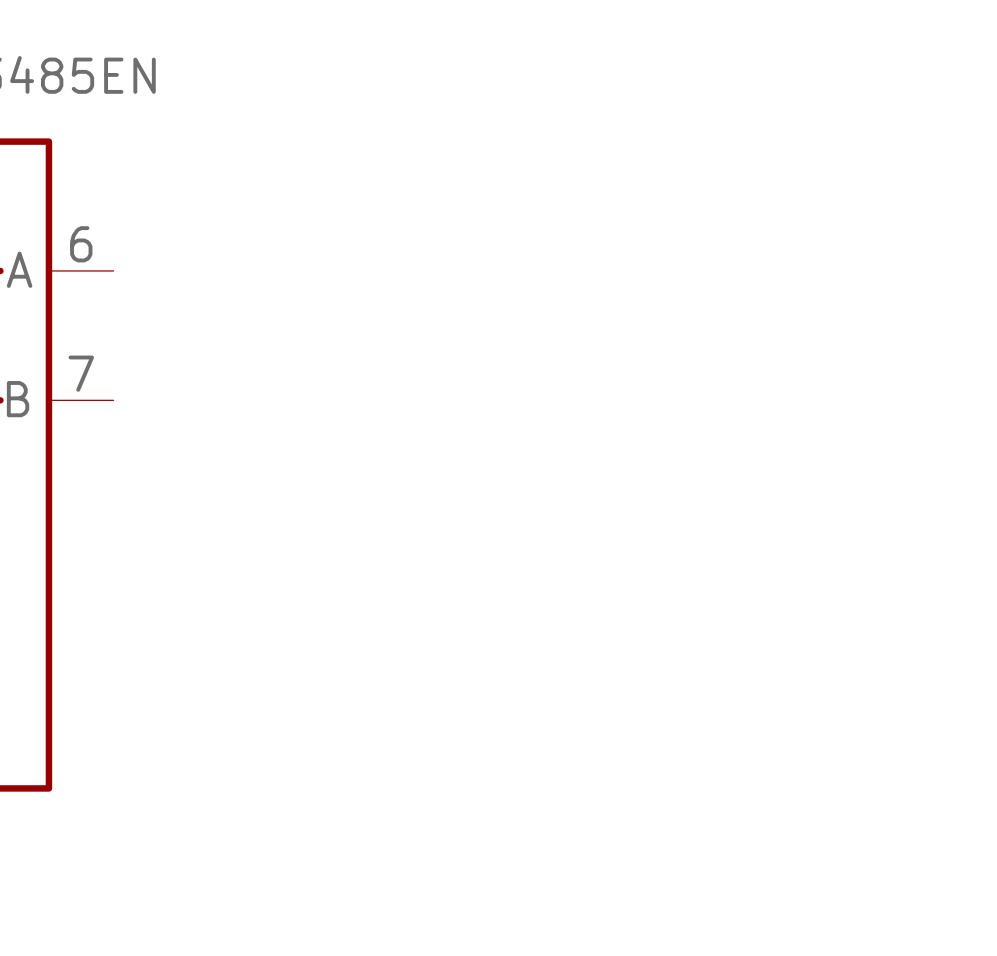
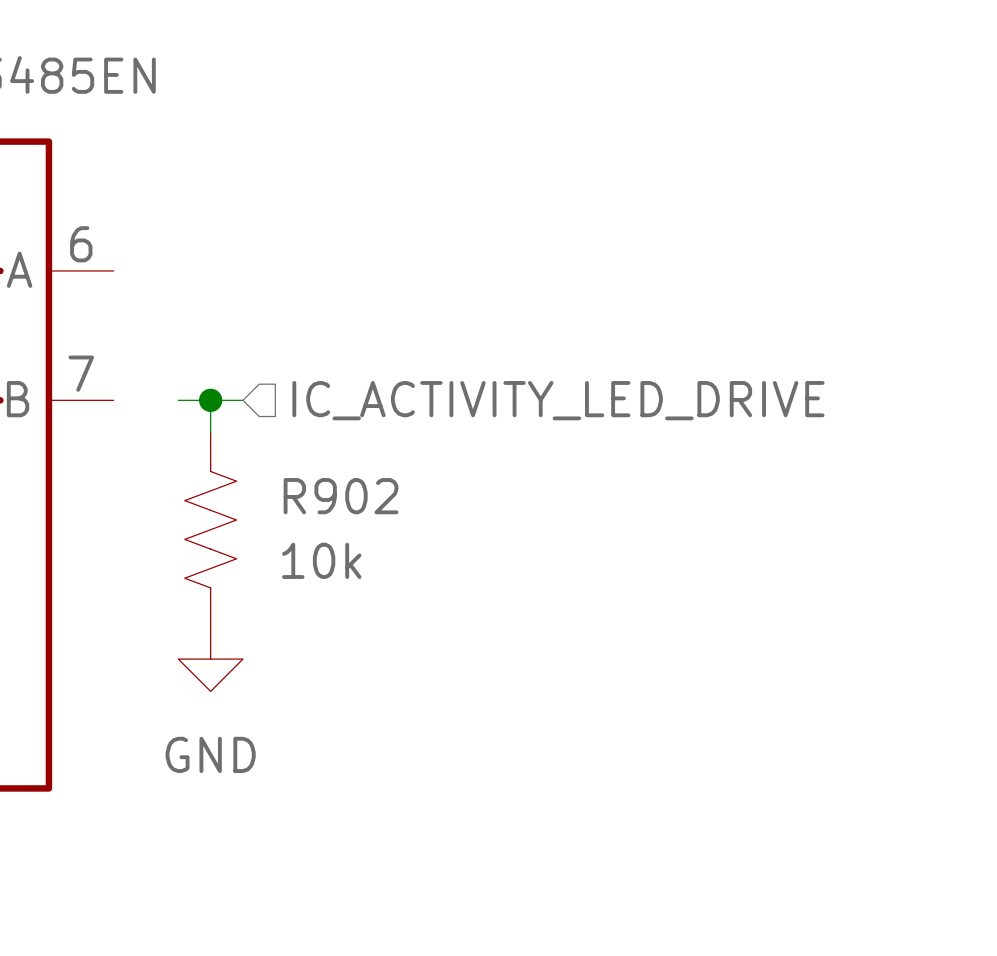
wire: none -> (178, 400) (242, 400)
wire: none -> (210, 400) (210, 432)
junction: none -> (210, 400)
hierarchical label: none -> IC_ACTIVITY_LED_DRIVE (558, 400)
R902: none -> 10k (210, 529)
power symbol: none -> GND (210, 659)

